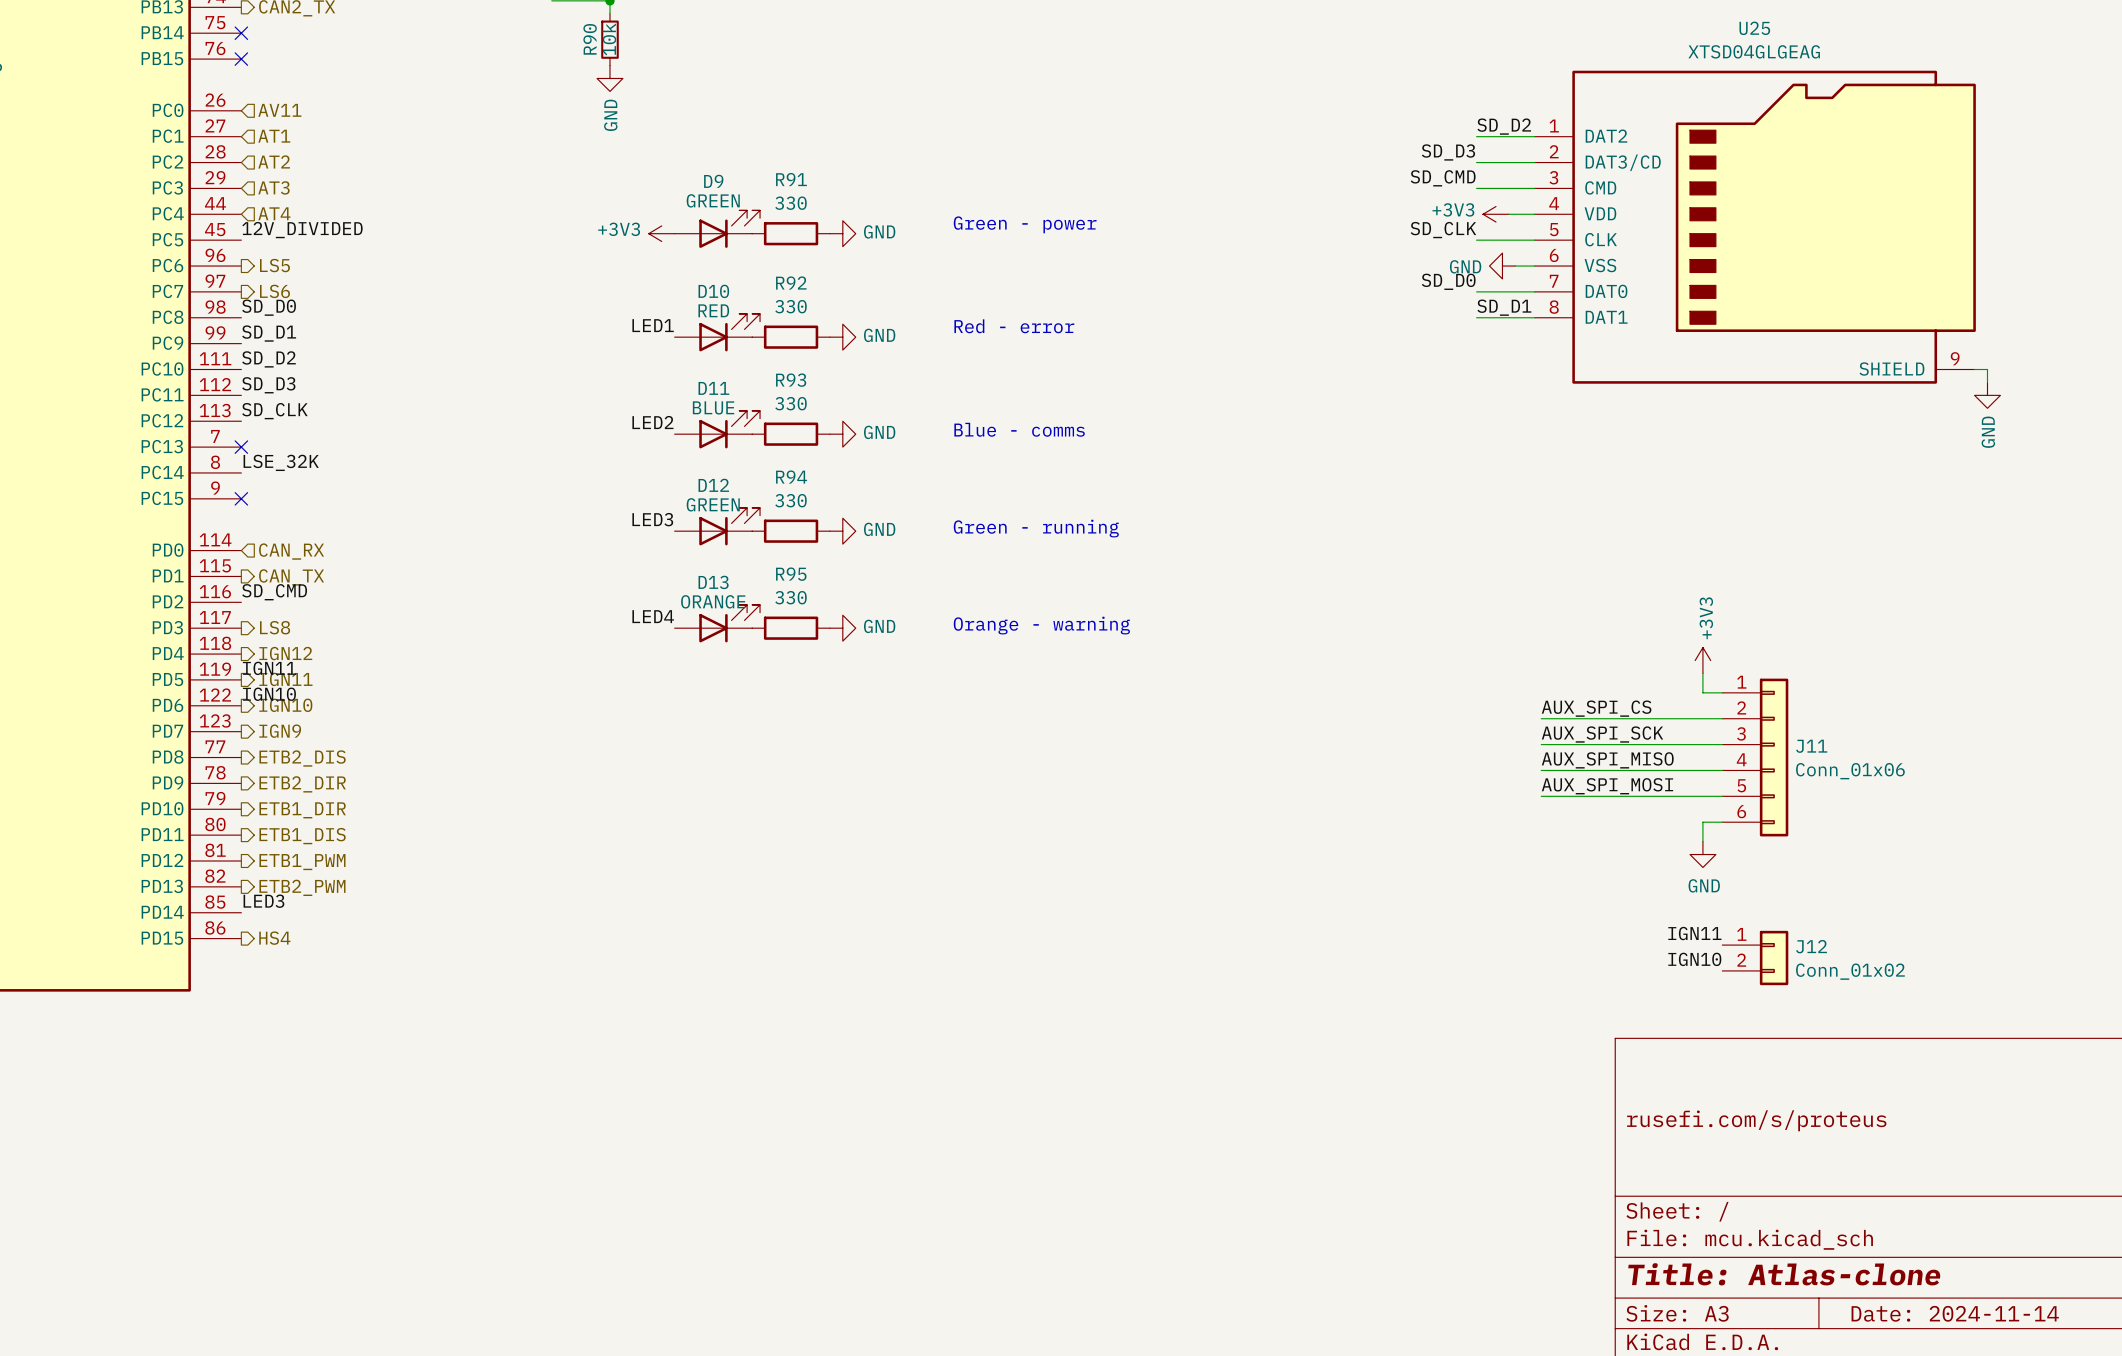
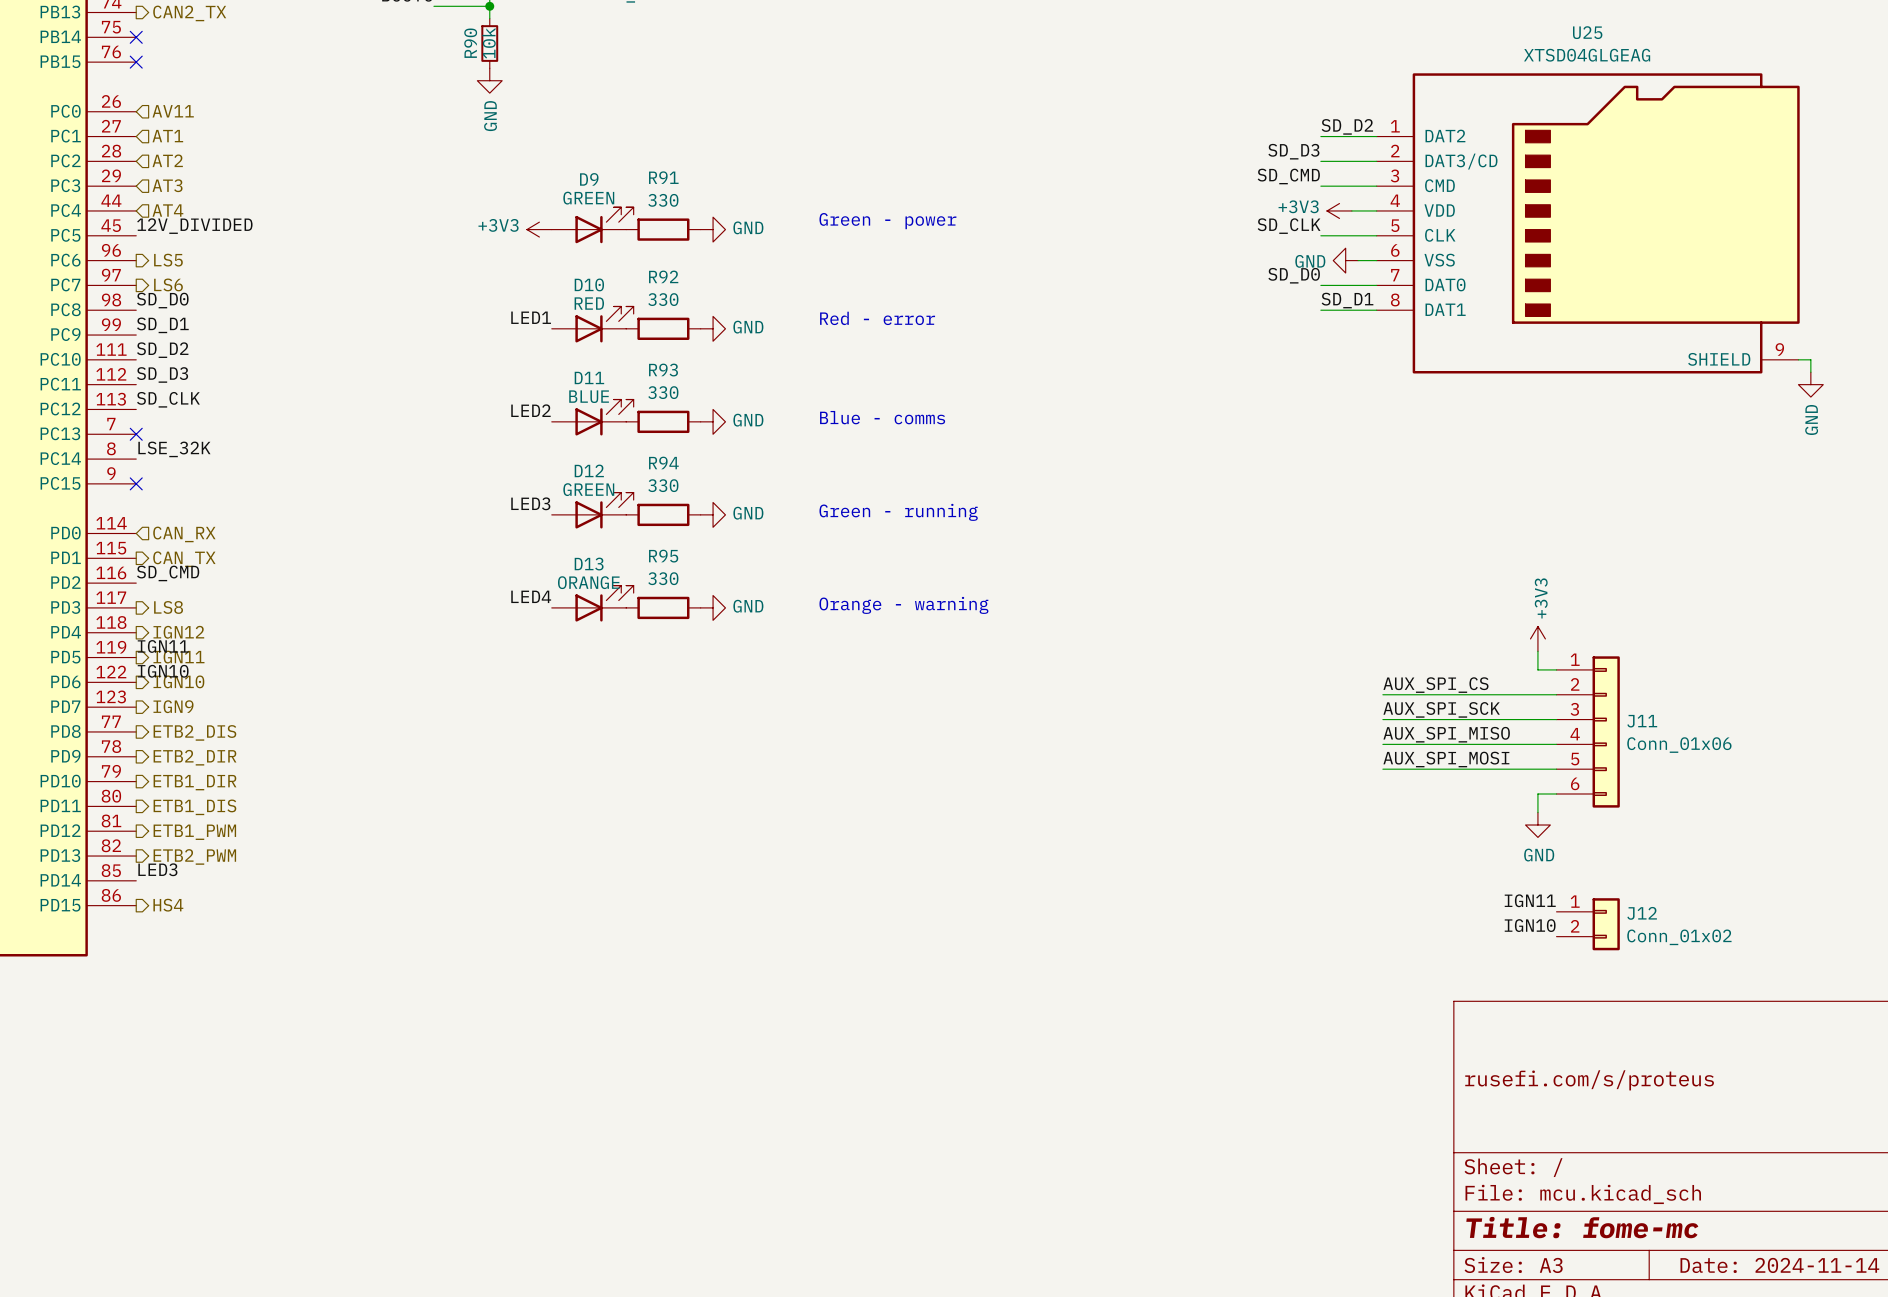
title block: Title: Atlas-clone (1784, 1274) -> Title: fome-mc (1582, 1227)

